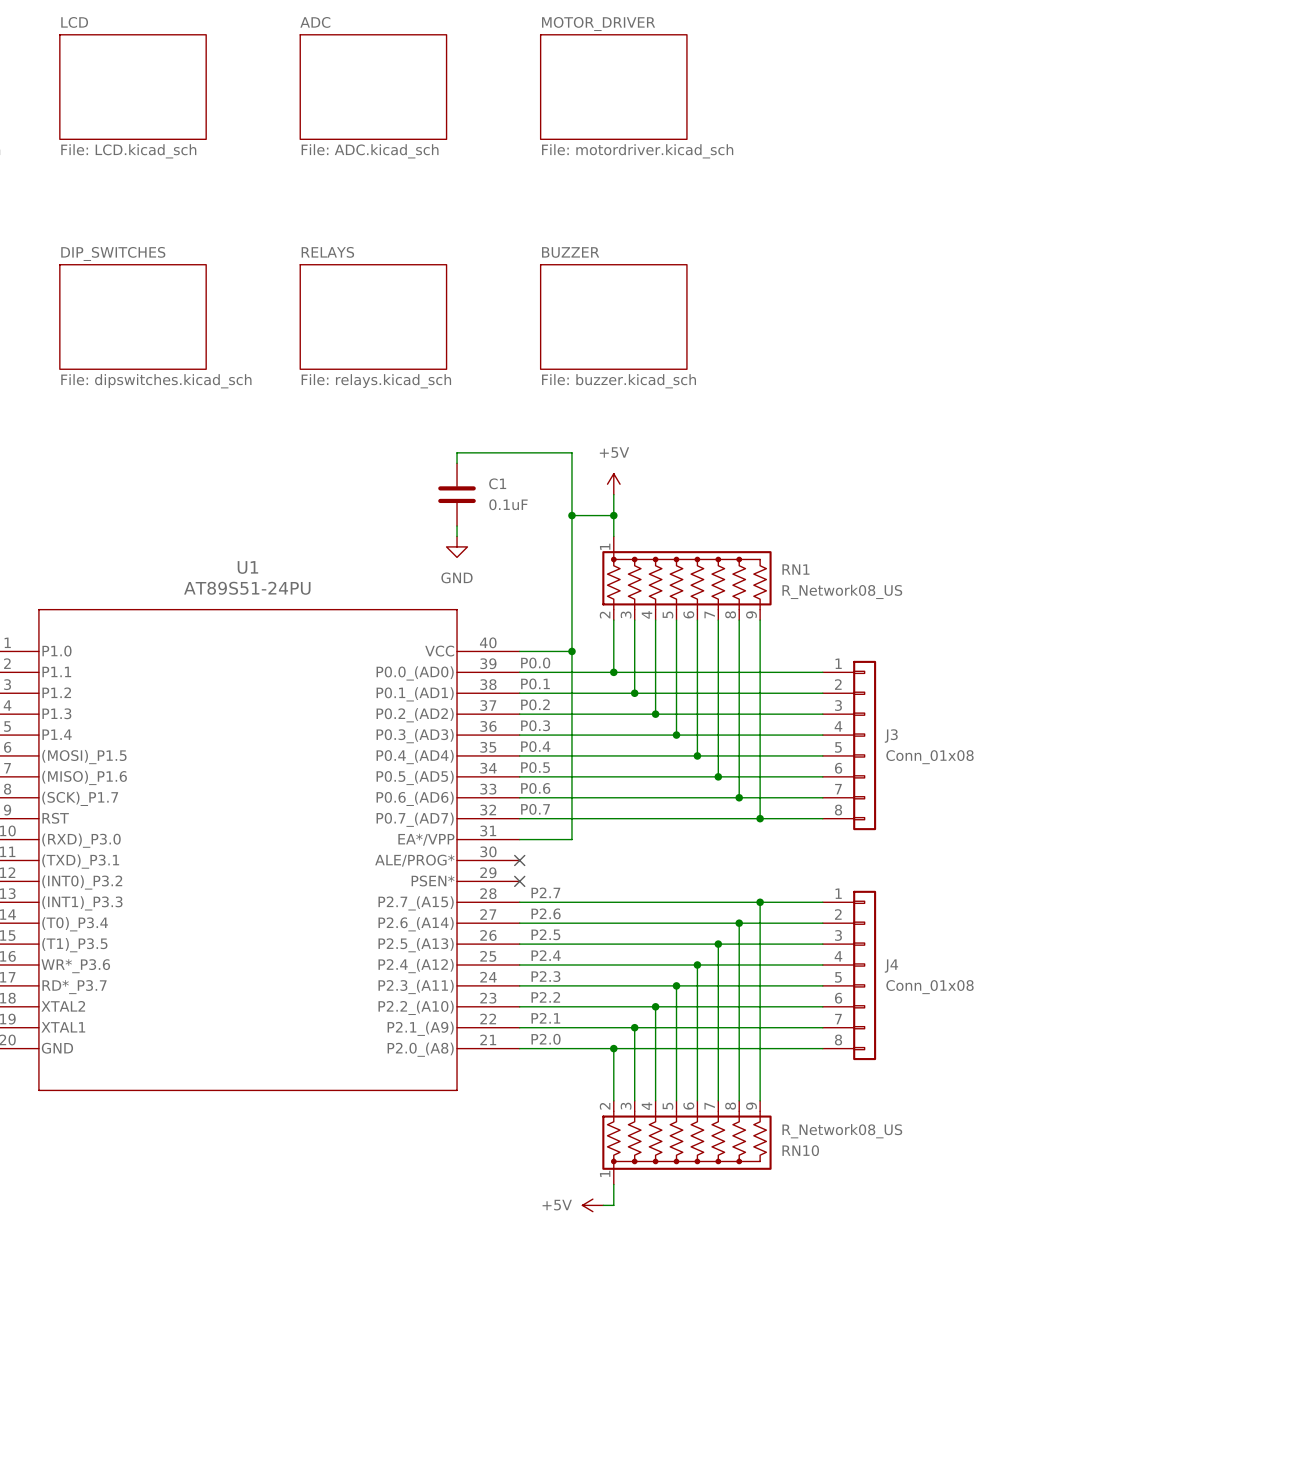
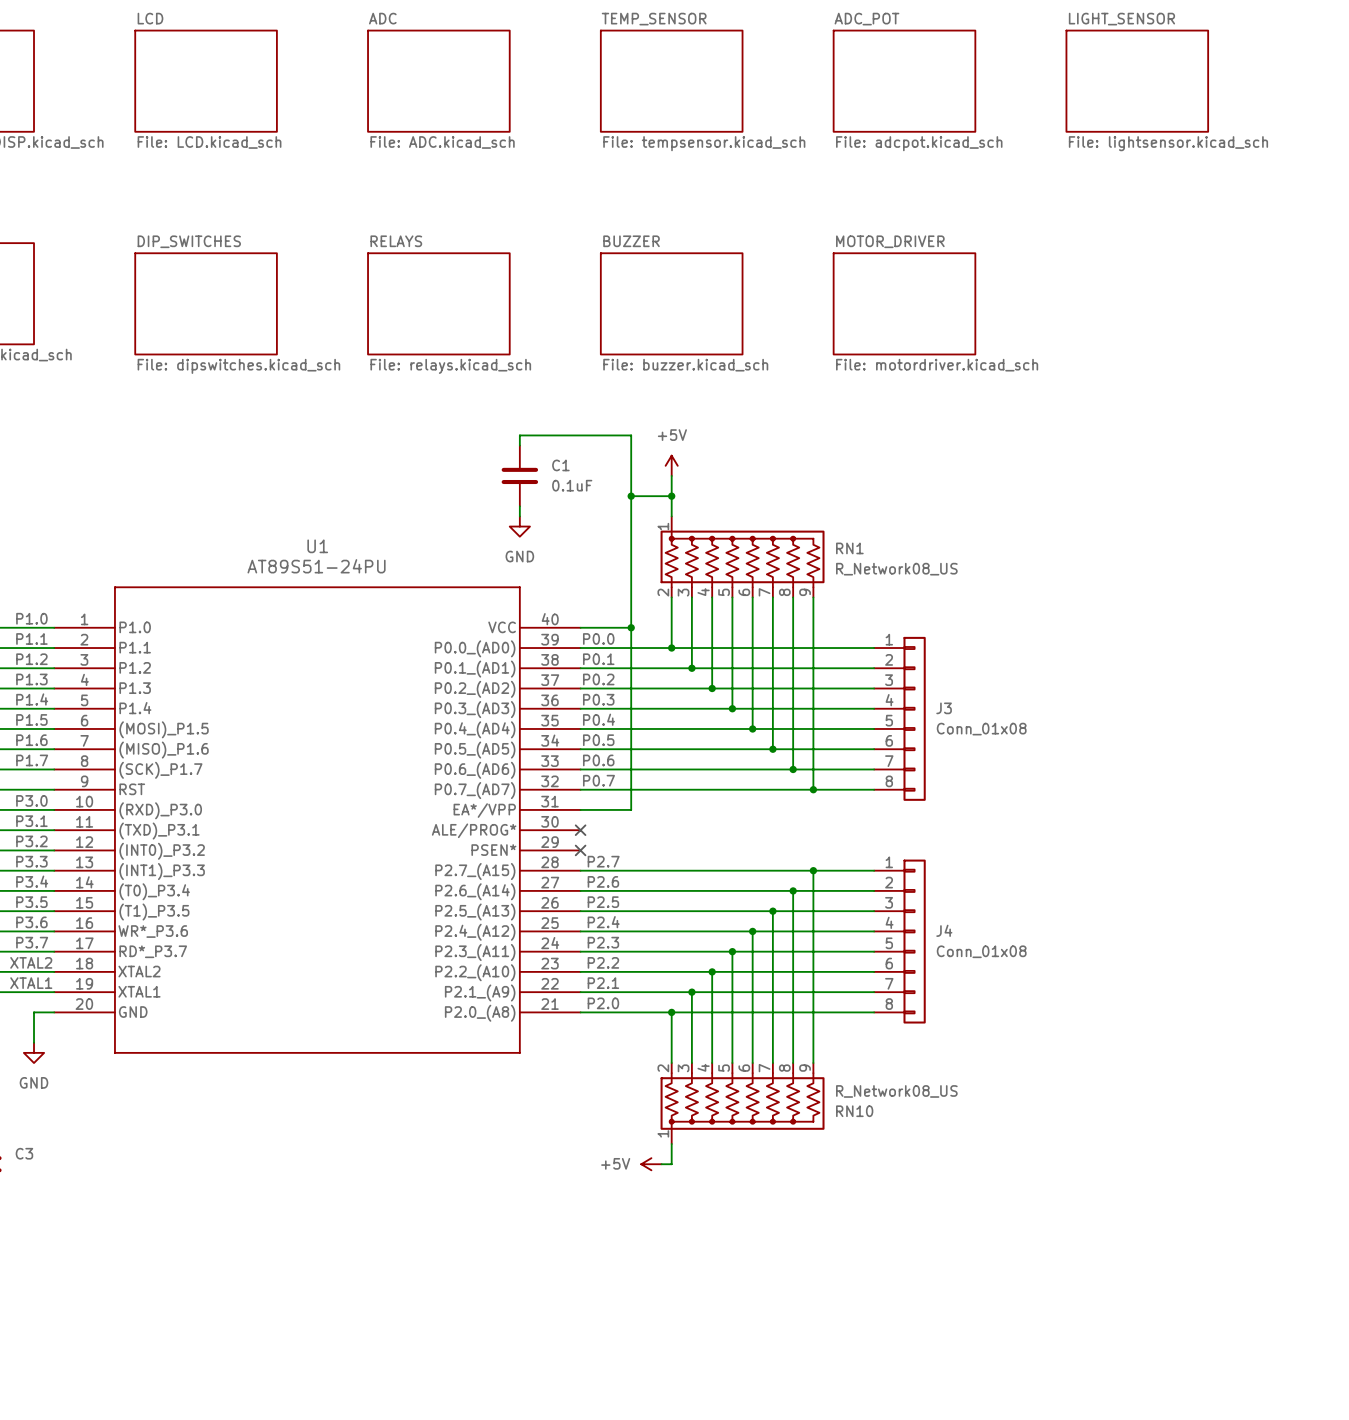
sheet MOTOR_DRIVER name: MOTOR_DRIVER (598, 24) -> TEMP_SENSOR (654, 19)
sheet ADC_POT: none -> File: adcpot.kicad_sch (904, 81)
sheet LIGHT_SENSOR: none -> File: lightsensor.kicad_sch (1137, 81)
sheet MOTOR_DRIVER value: File: motordriver.kicad_sch (637, 151) -> File: tempsensor.kicad_sch (704, 143)
sheet MOTOR_DRIVER: none -> File: motordriver.kicad_sch (904, 303)

